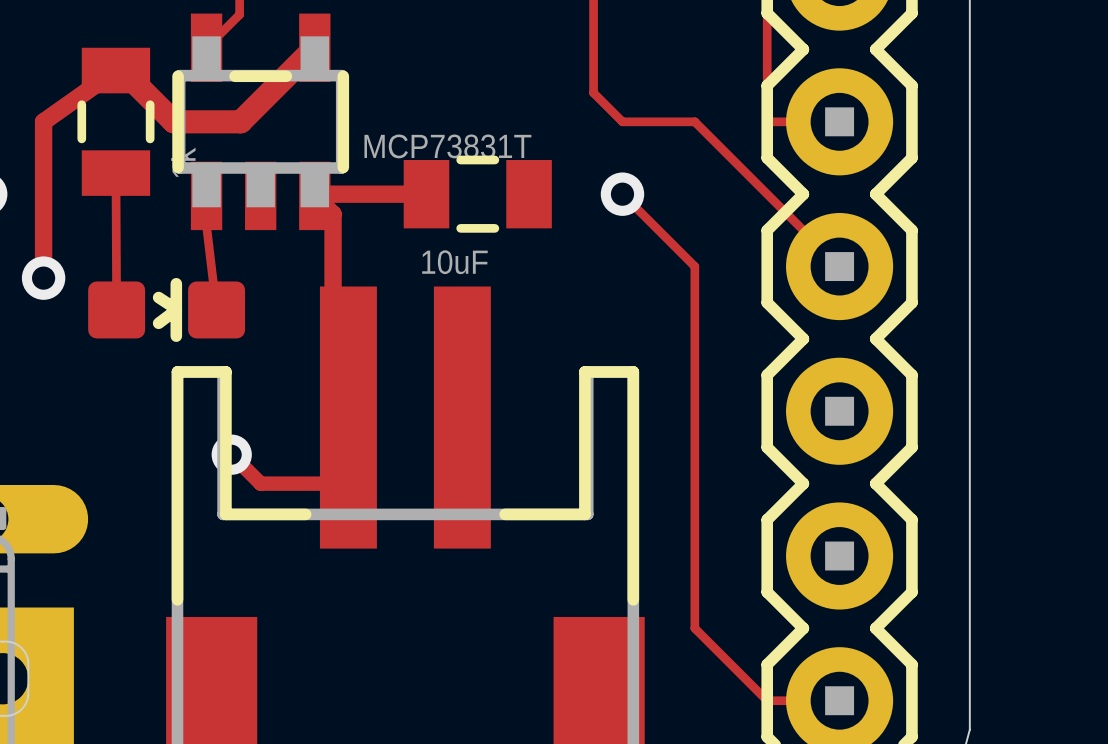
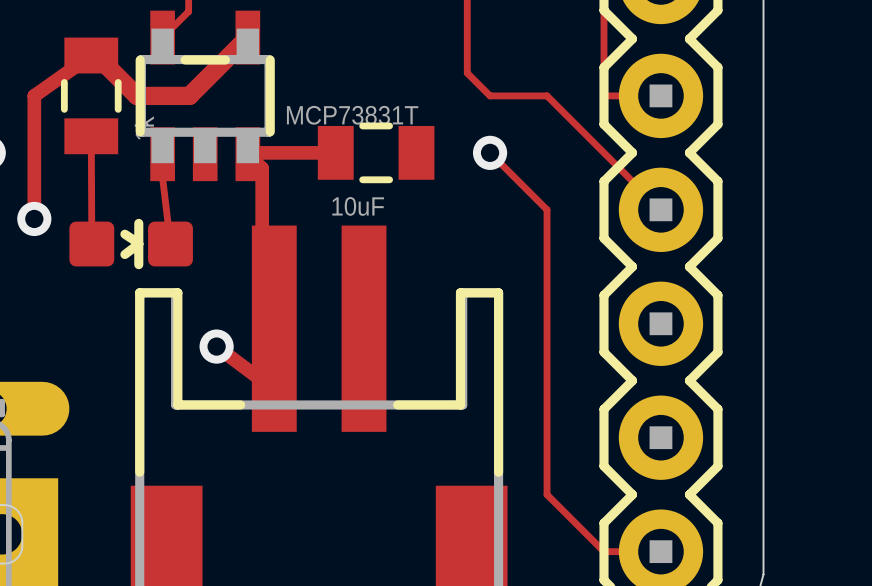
via: none -> (216, 346)
track: (231, 454) (260, 483) (333, 483) -> (216, 346) (262, 380)
via: (231, 454) -> none

